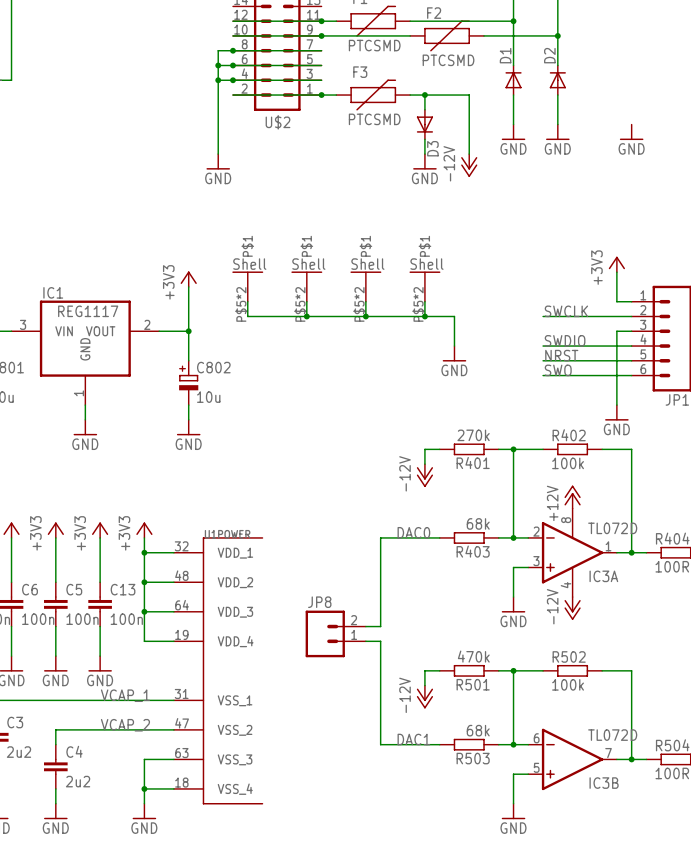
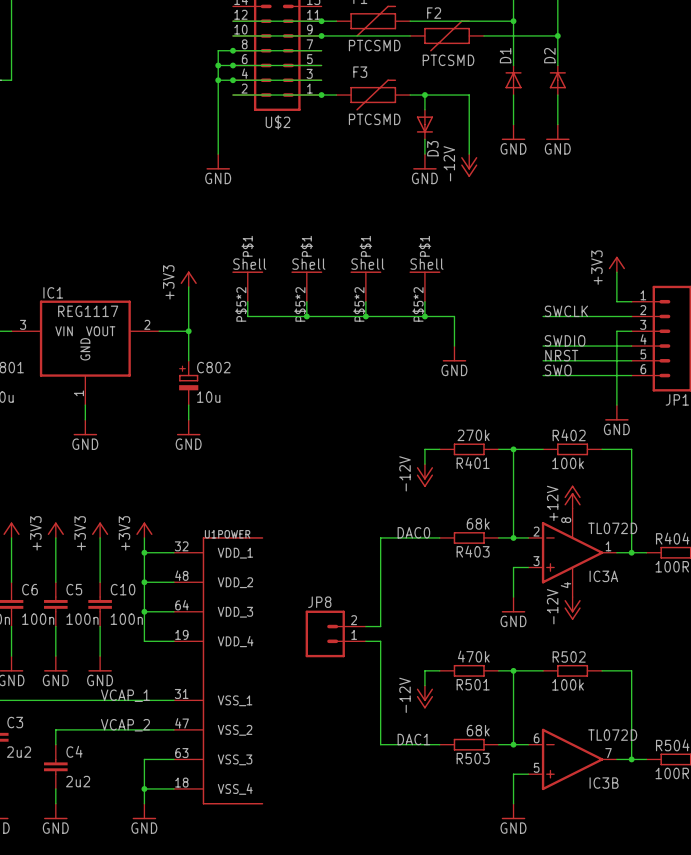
power symbol: GND (631, 132) -> none
C13 name: C13 (123, 589) -> C10 (123, 589)

